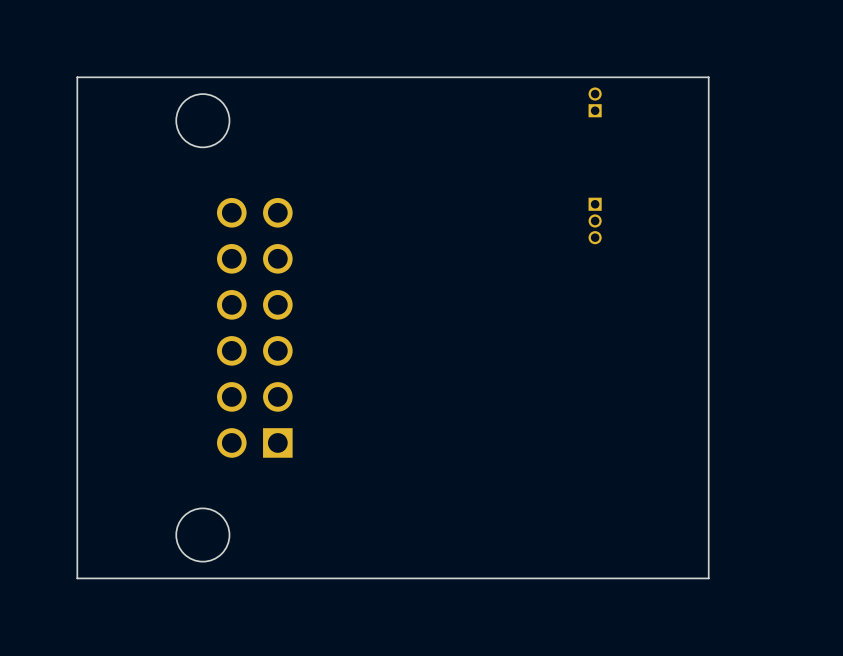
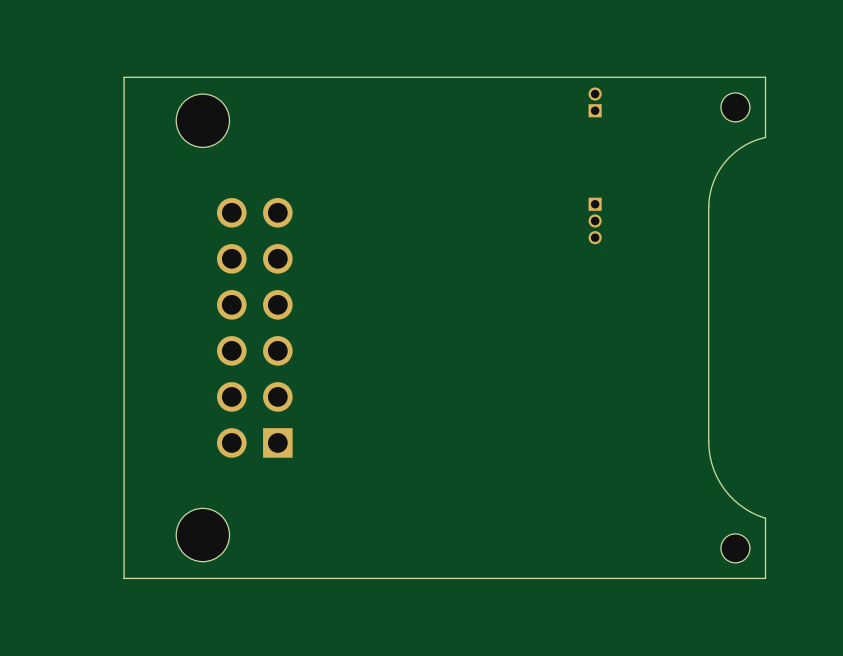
board edge: (124, 77) (77, 77) (77, 578) (124, 578) -> (124, 77) (124, 578)
board edge: (708, 77) (708, 207) -> (708, 77) (765, 77) (765, 137) (745, 144) (724, 162) (711, 187) (708, 207)
part: none -> (735, 107)
board edge: (708, 441) (708, 578) -> (708, 441) (711, 463) (724, 489) (745, 509) (765, 518) (765, 578) (708, 578)
part: none -> (735, 548)

